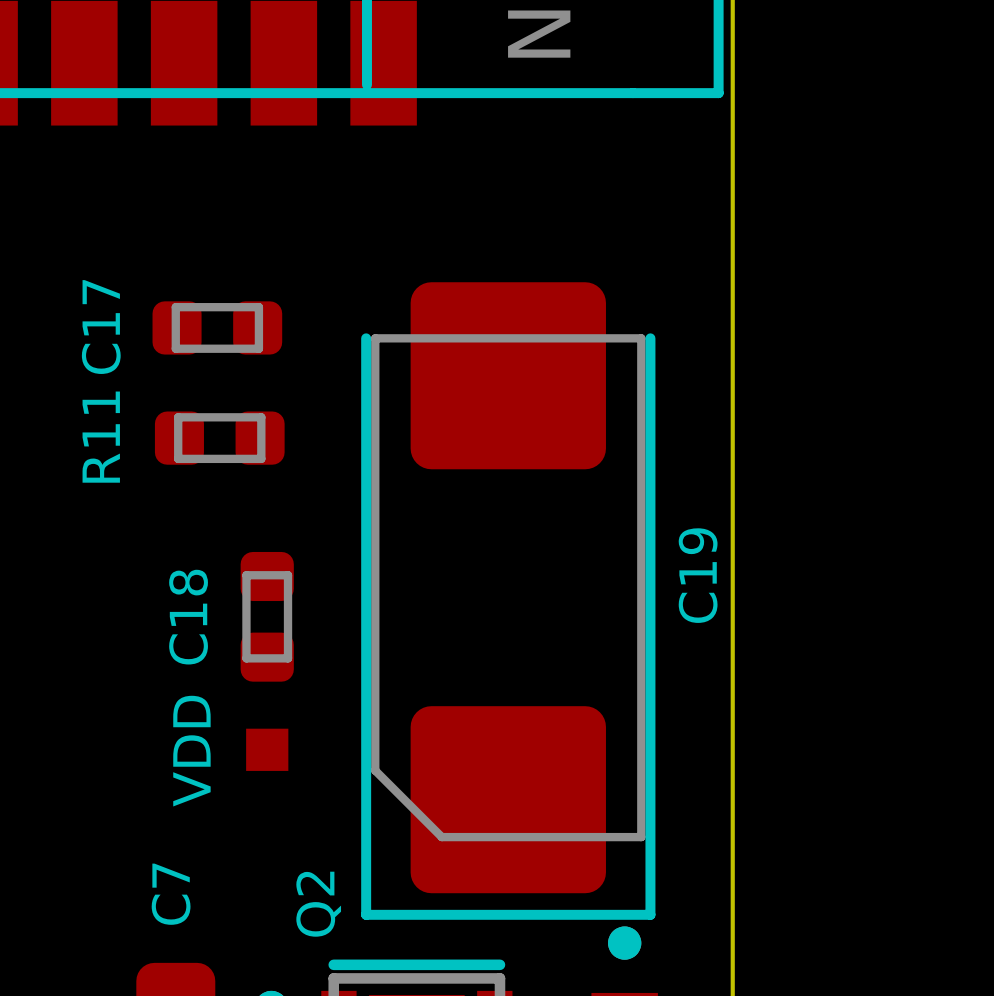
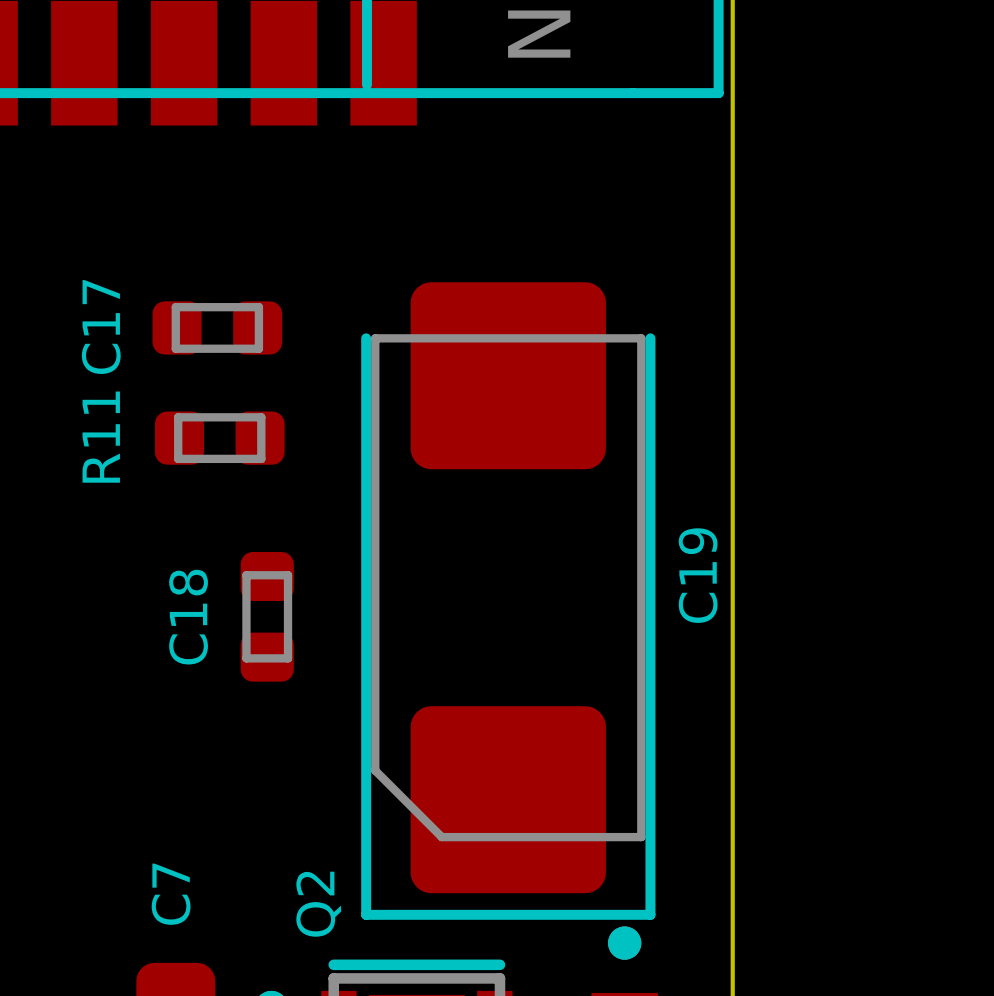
VDD: (267, 749) -> none

